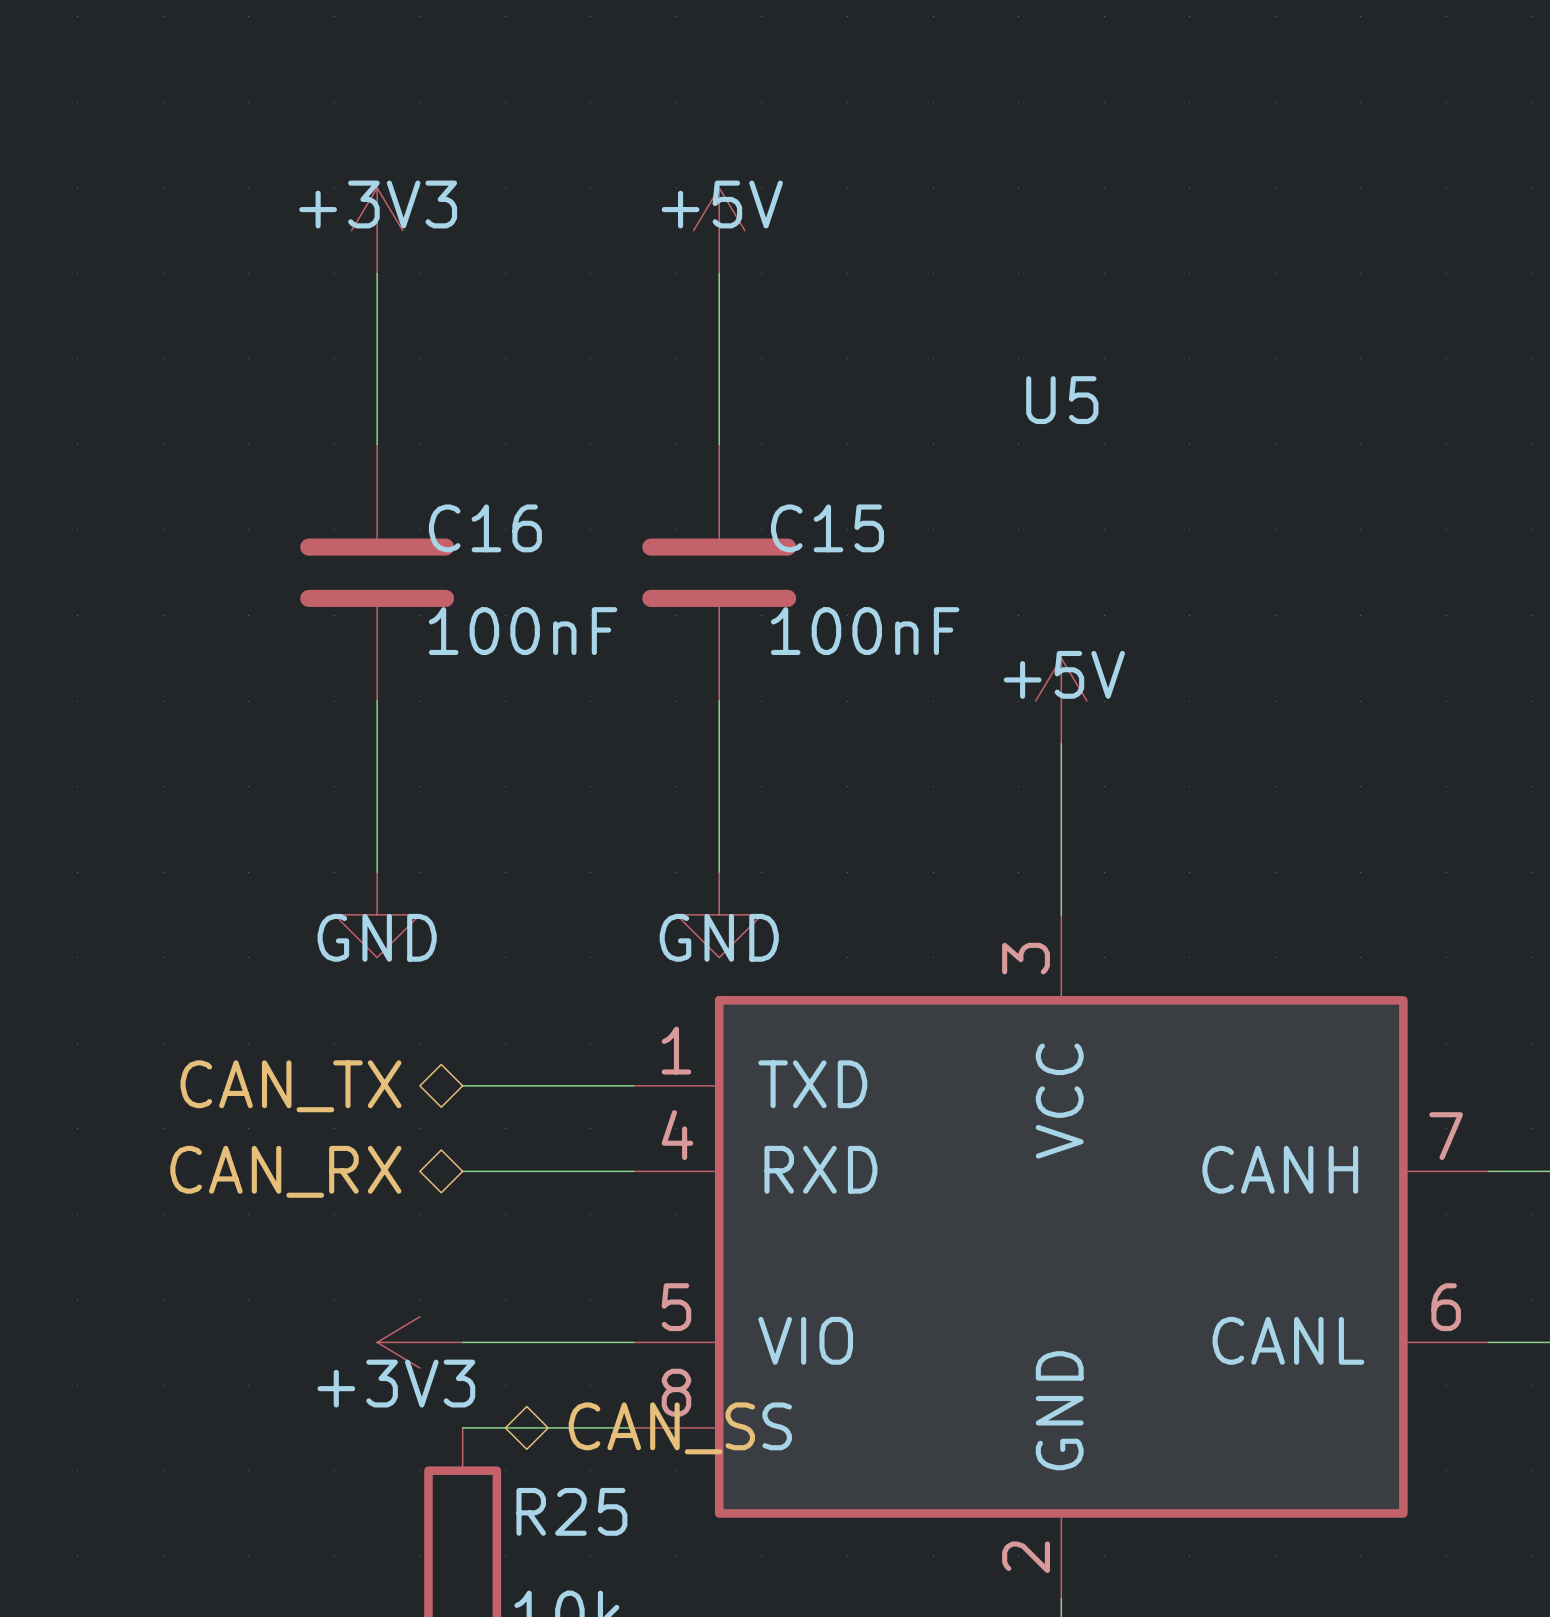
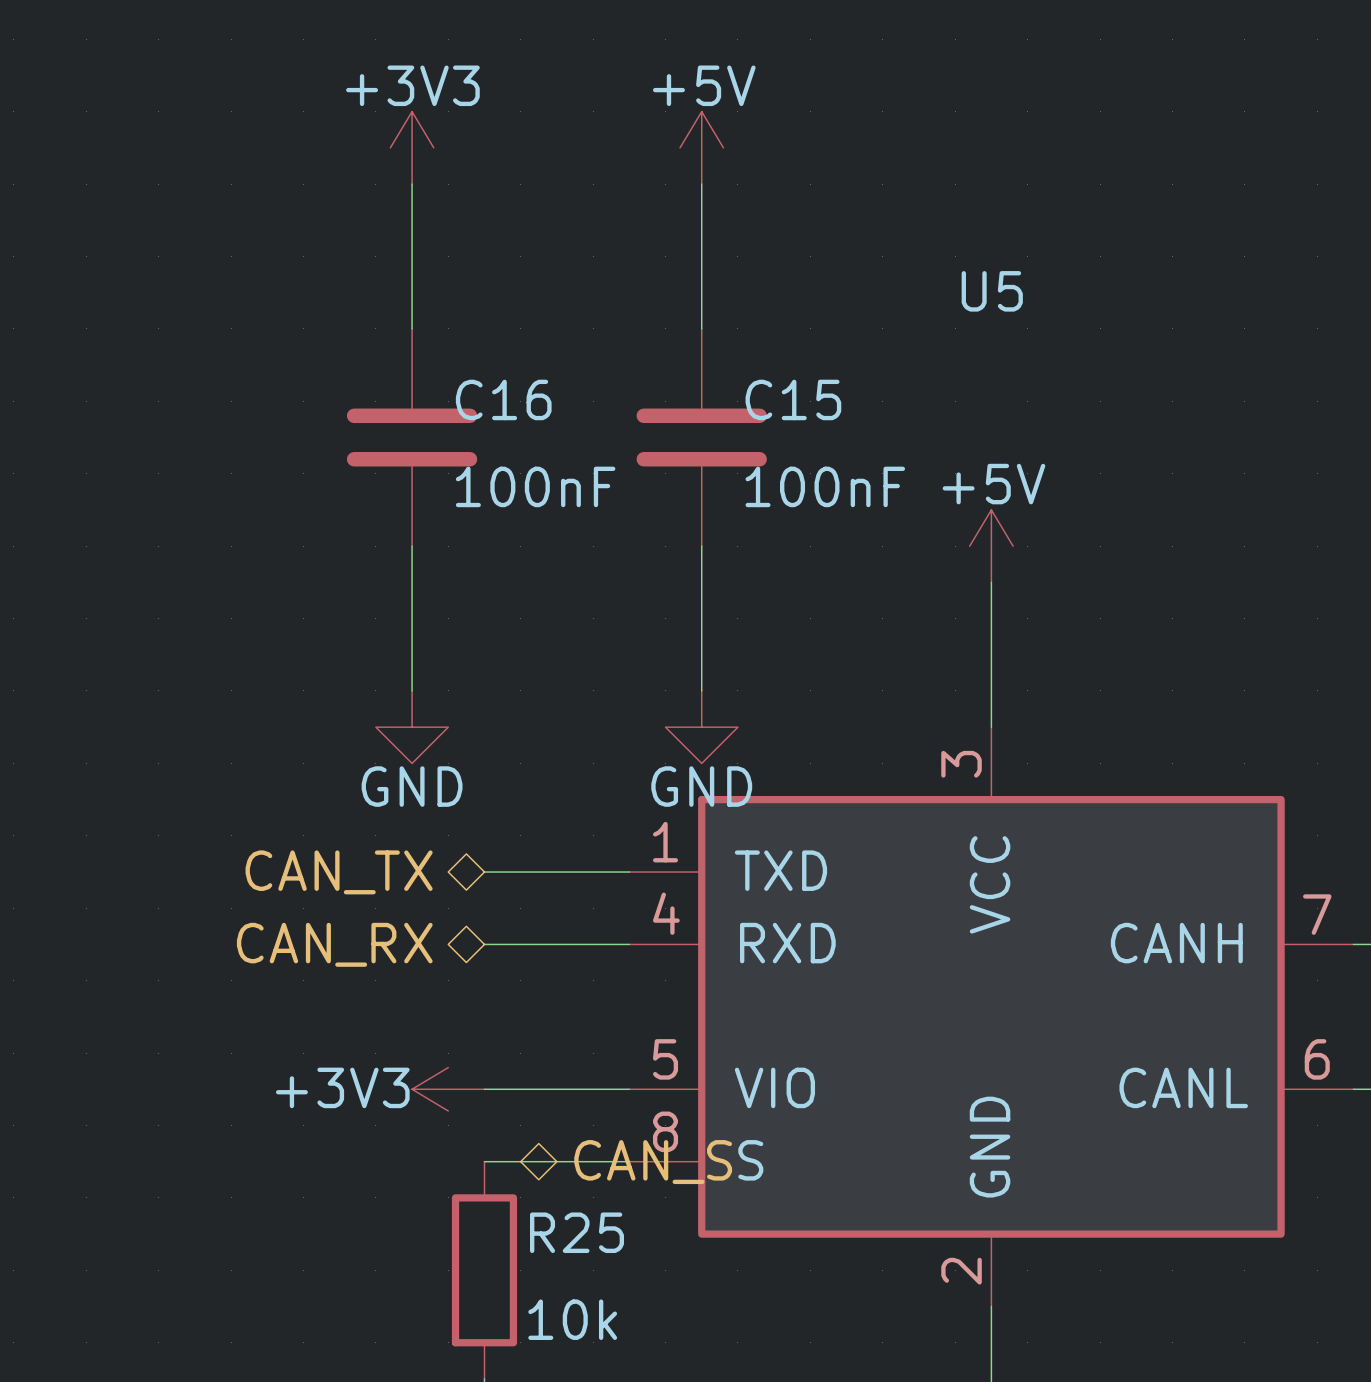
power symbol text position: +3V3 (378, 204) -> +3V3 (412, 85)
power symbol text position: +5V (722, 204) -> +5V (704, 85)
power symbol text position: +5V (1064, 674) -> +5V (993, 484)
power symbol text position: GND (377, 937) -> GND (412, 786)
power symbol text position: GND (719, 937) -> GND (701, 786)
power symbol text position: +3V3 (396, 1383) -> +3V3 (342, 1087)

